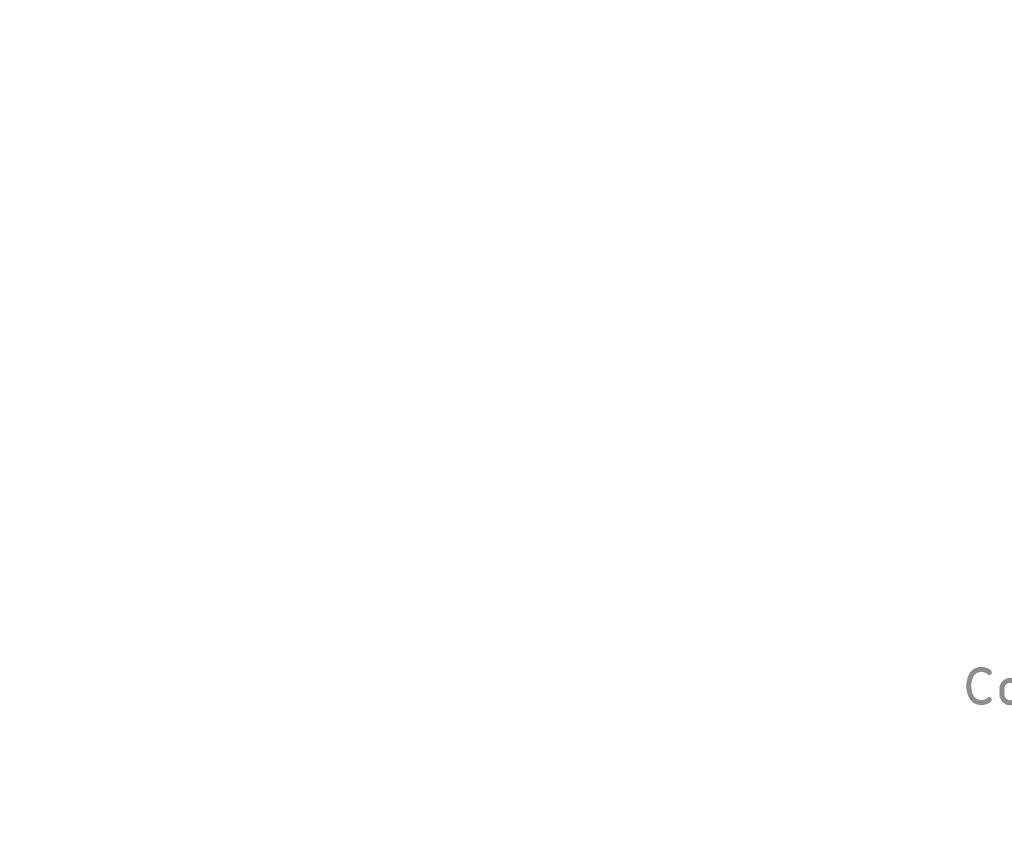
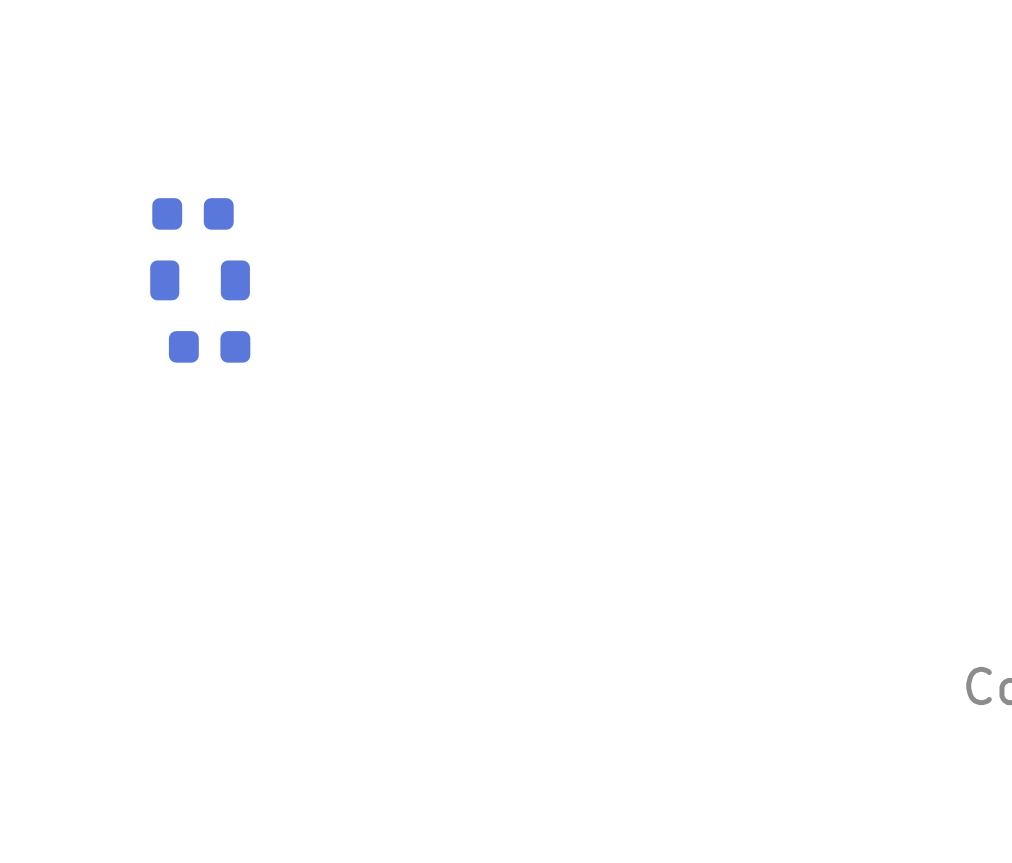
part: none -> (193, 213)
part: none -> (200, 280)
part: none -> (209, 346)

